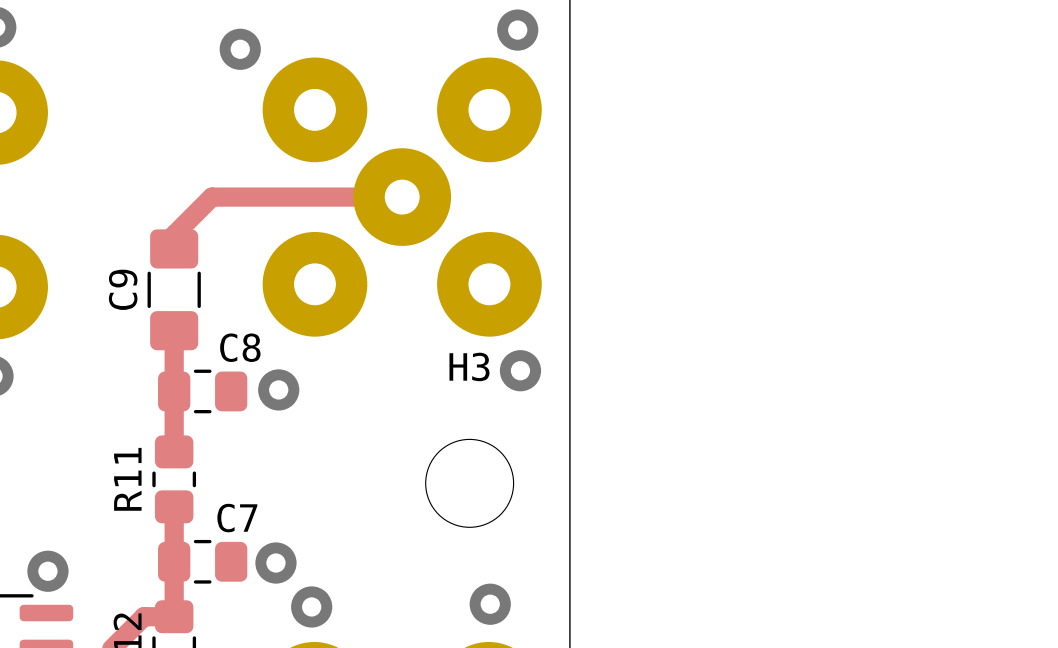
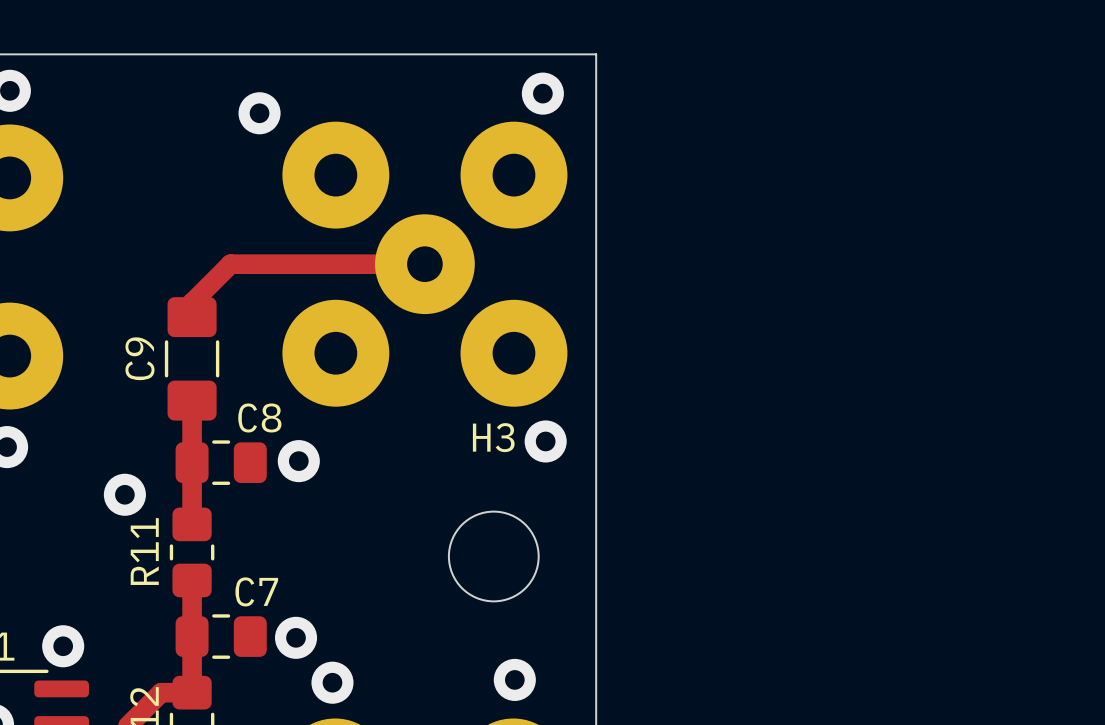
via: none -> (124, 494)

